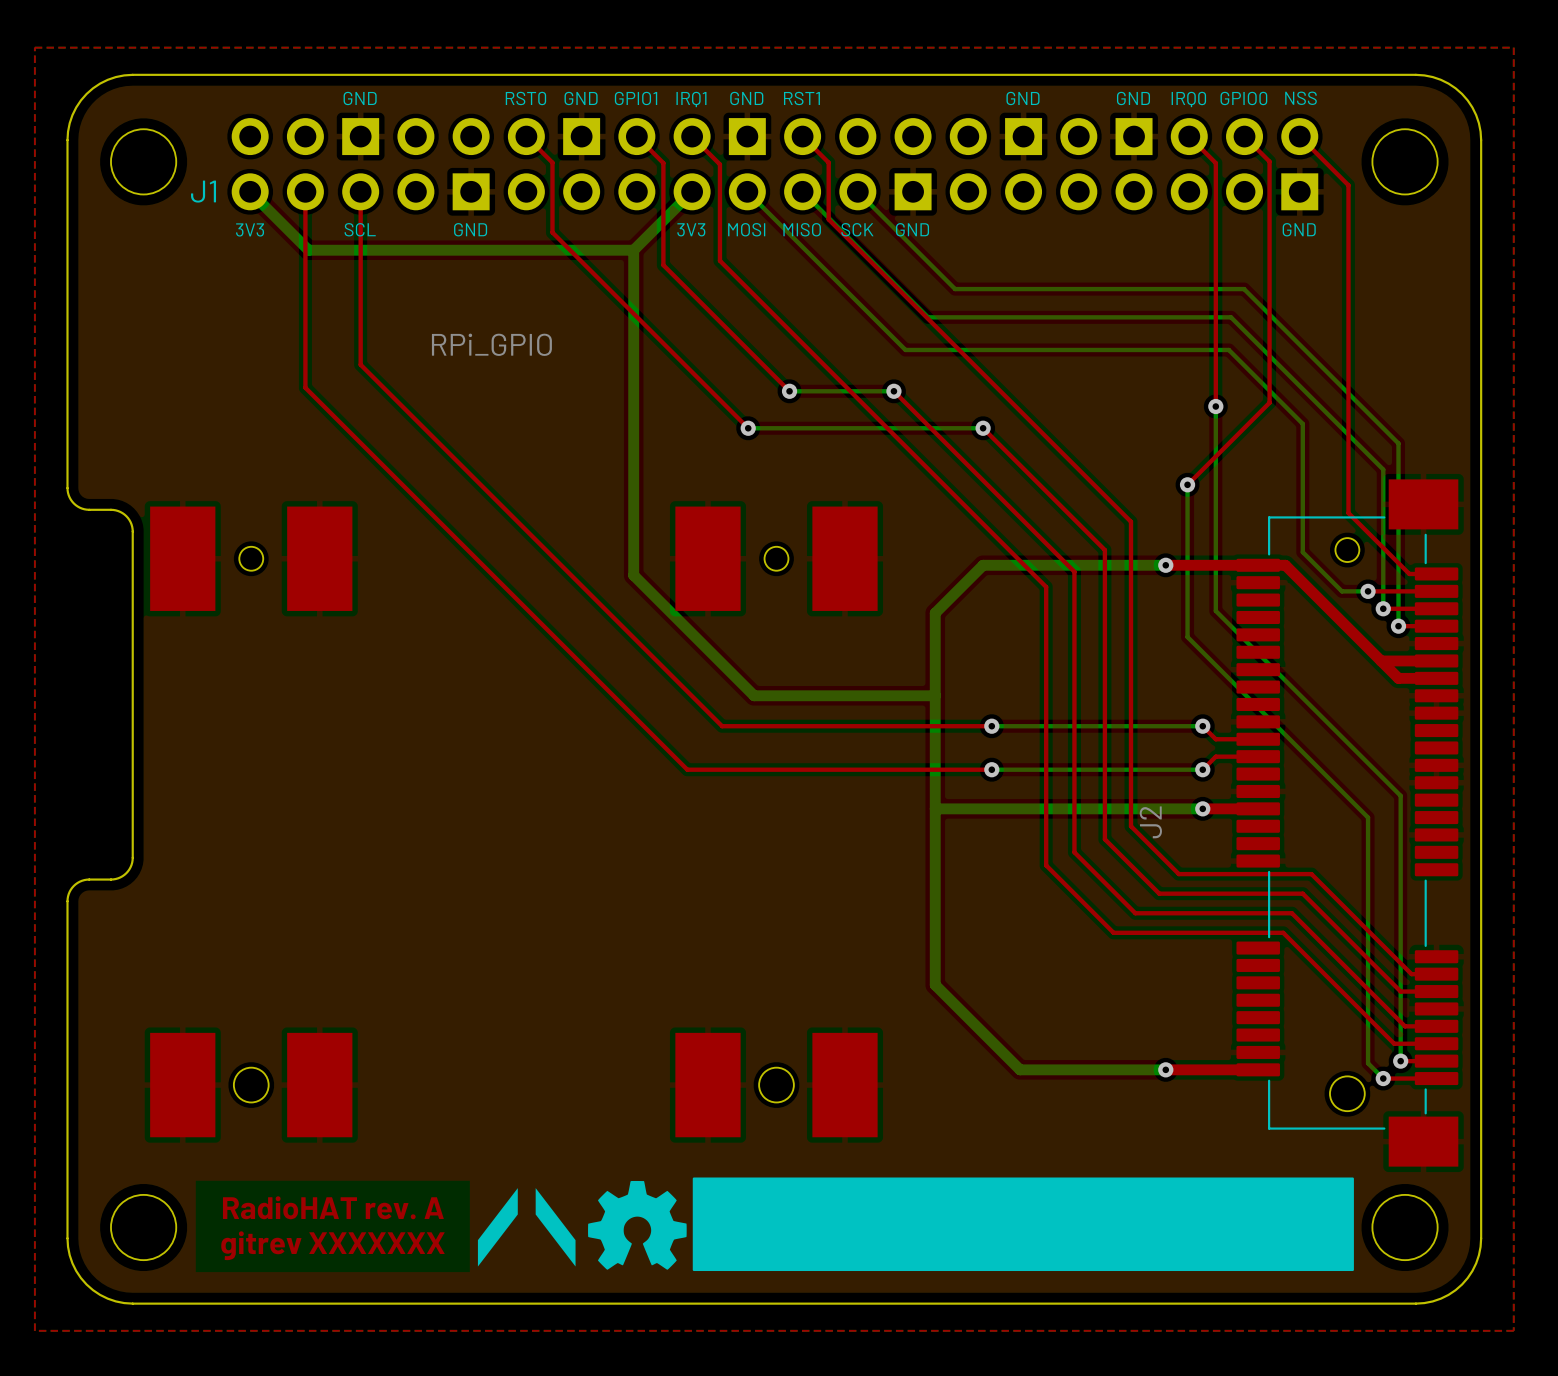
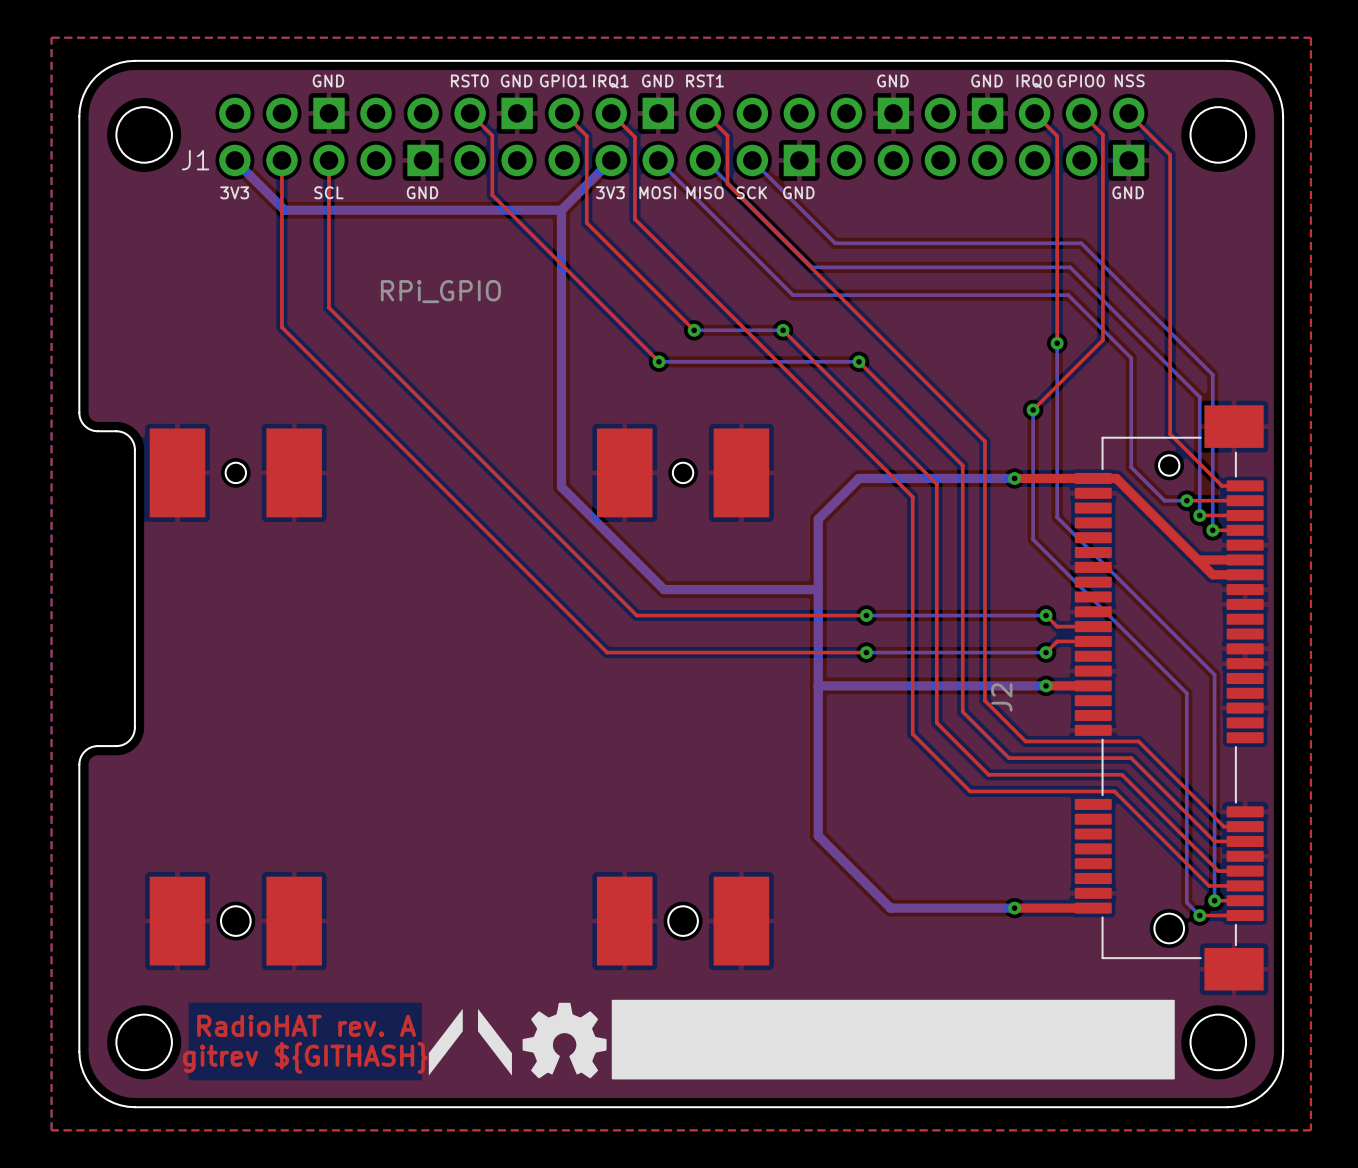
text: gitrev XXXXXXX (332, 1245) -> gitrev ${GITHASH} (305, 1057)

